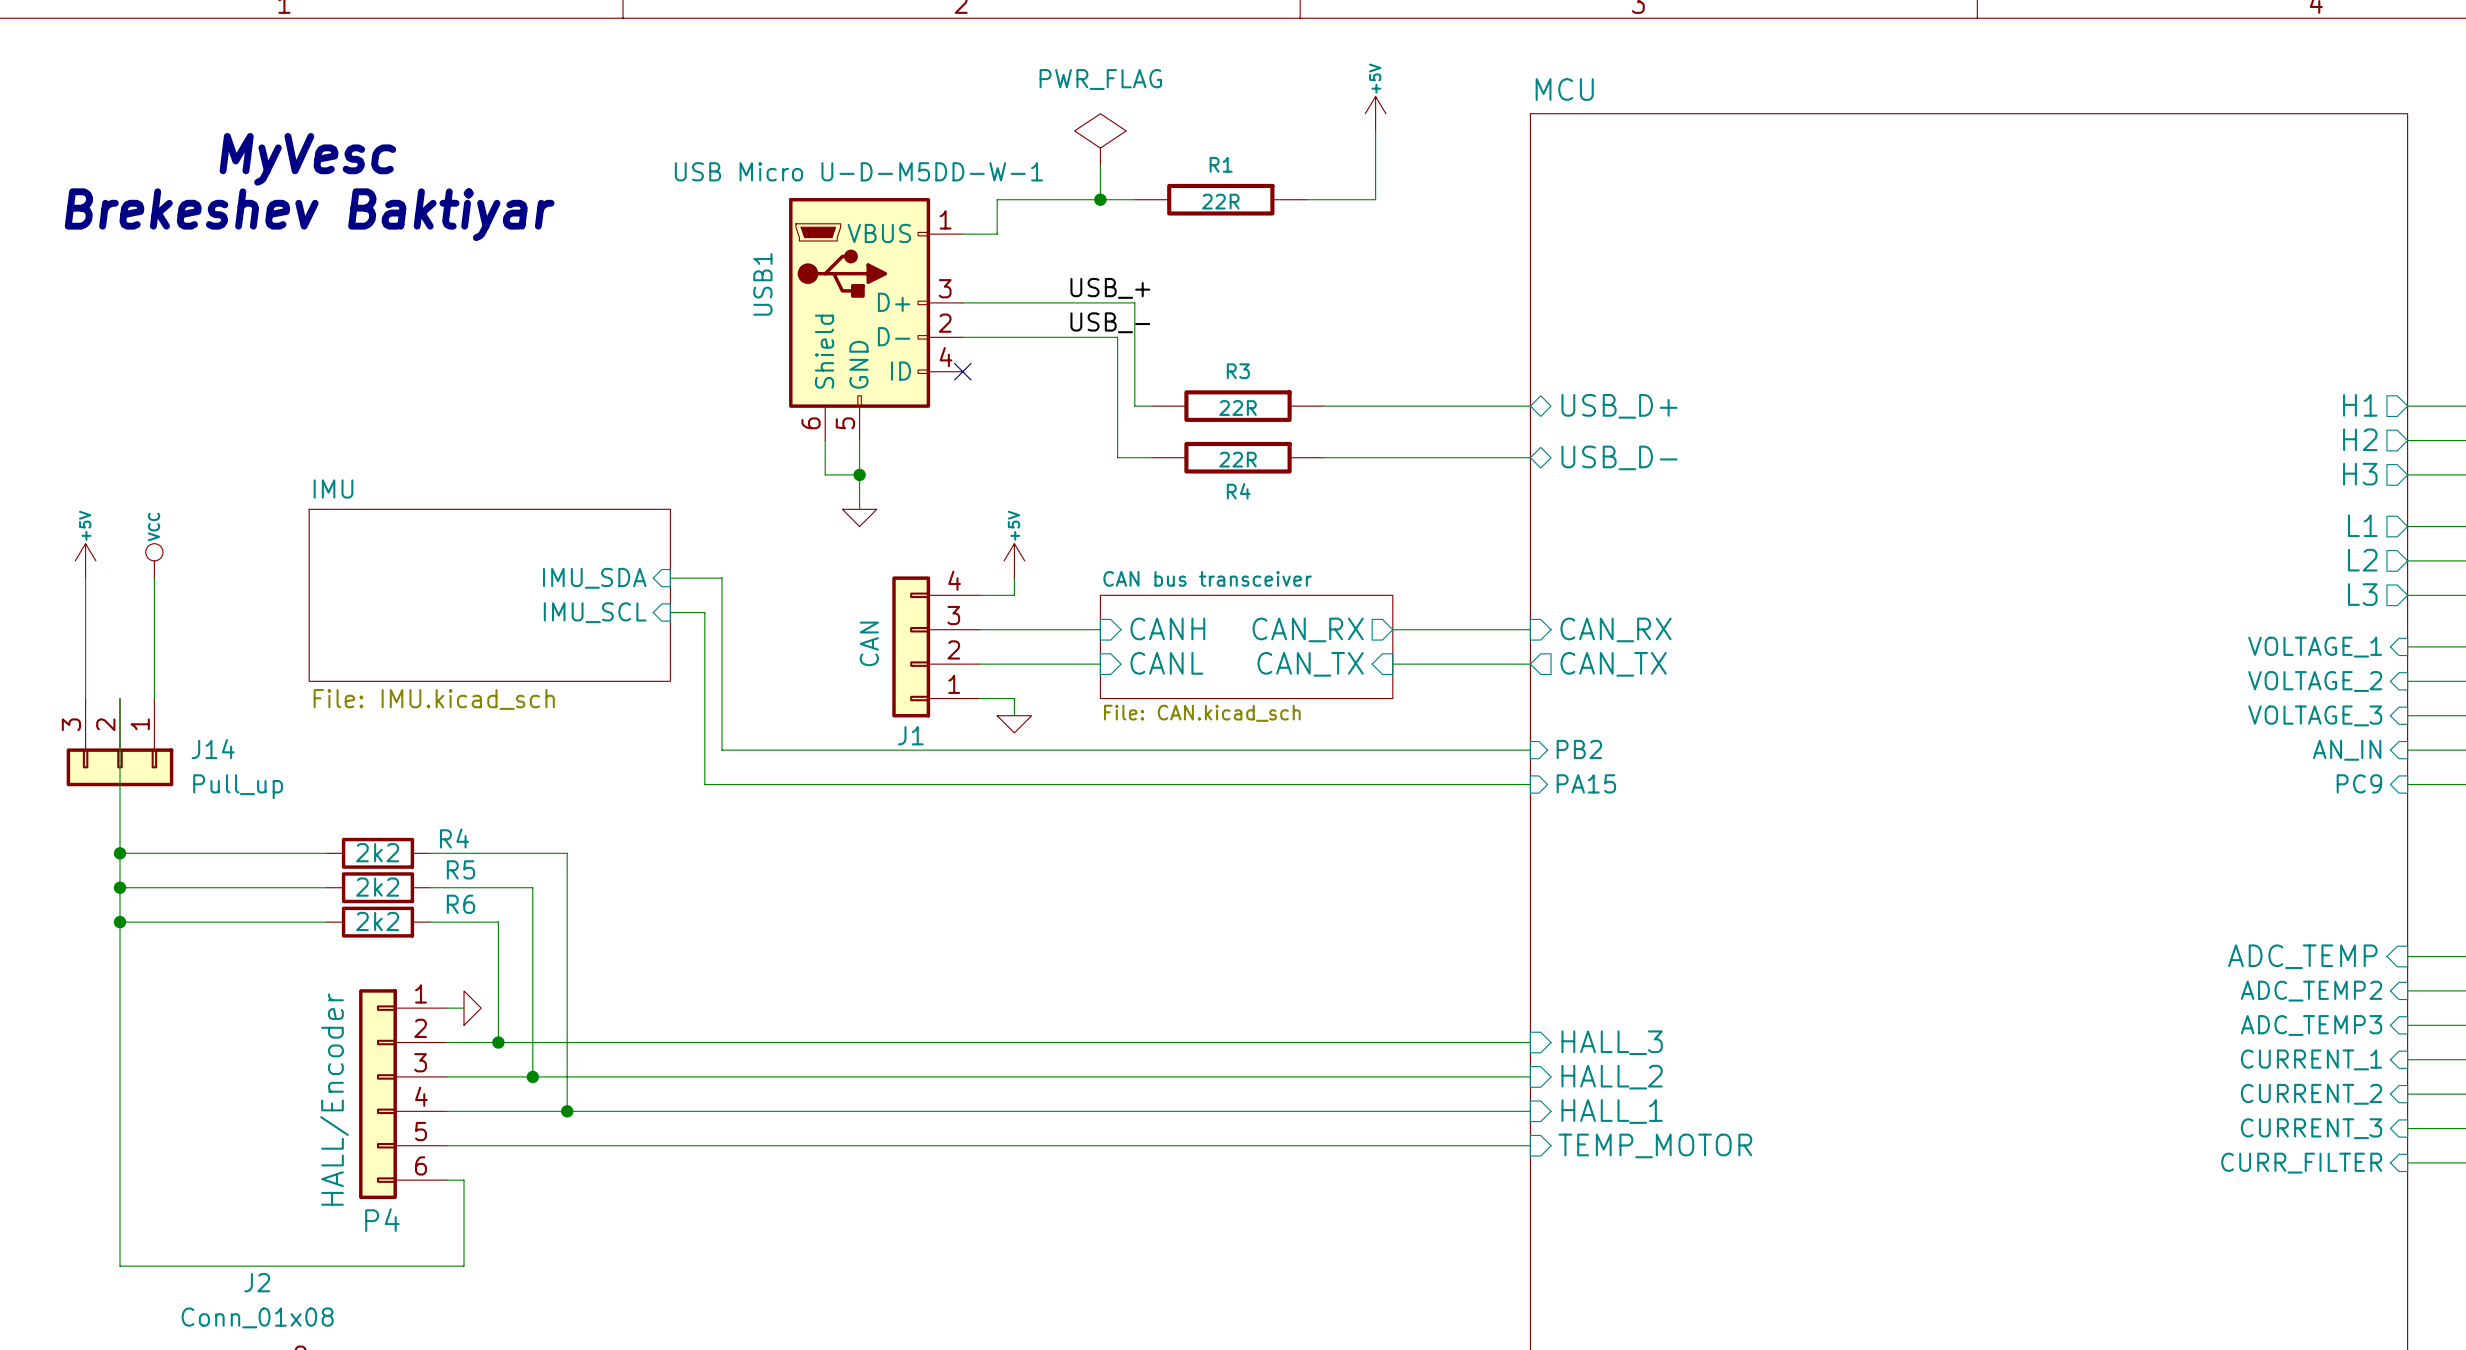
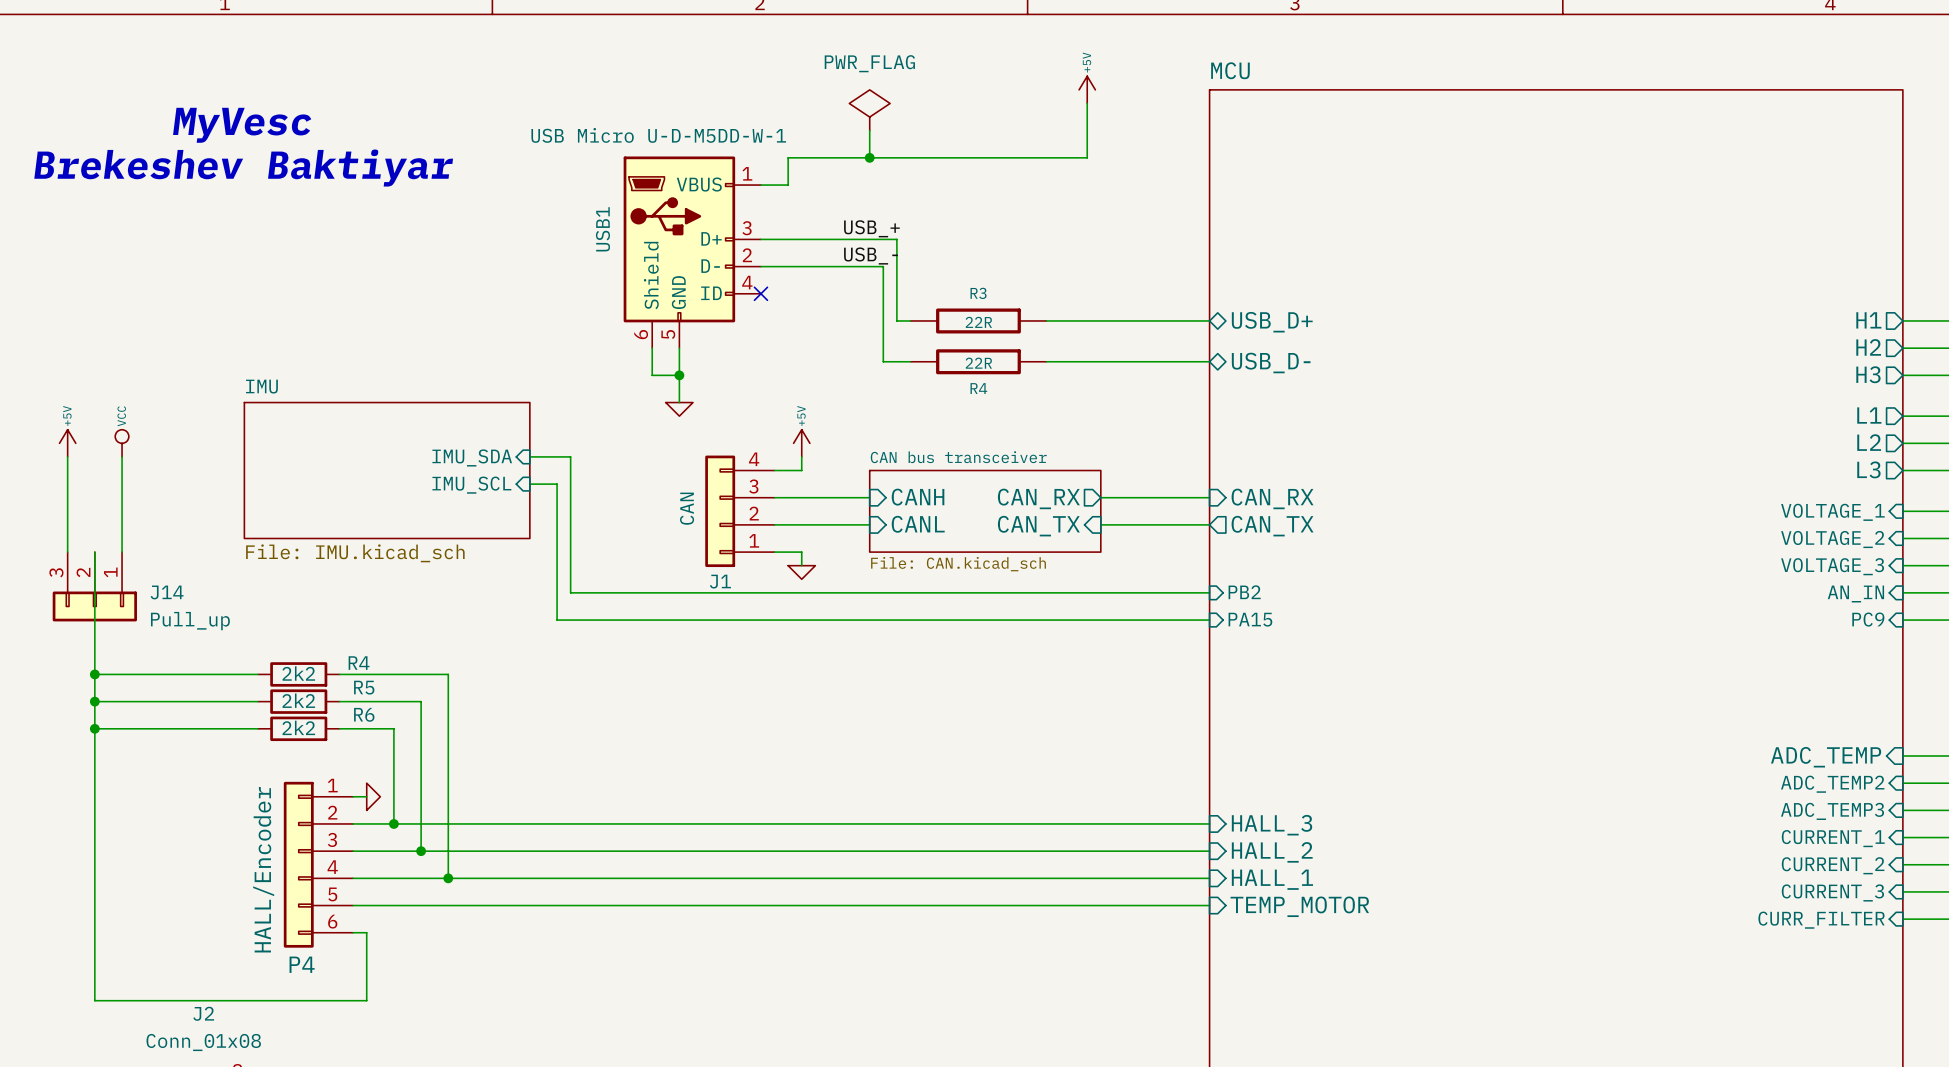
wire: none -> (896, 157) (1032, 157)
R1: 22R (1220, 199) -> none

